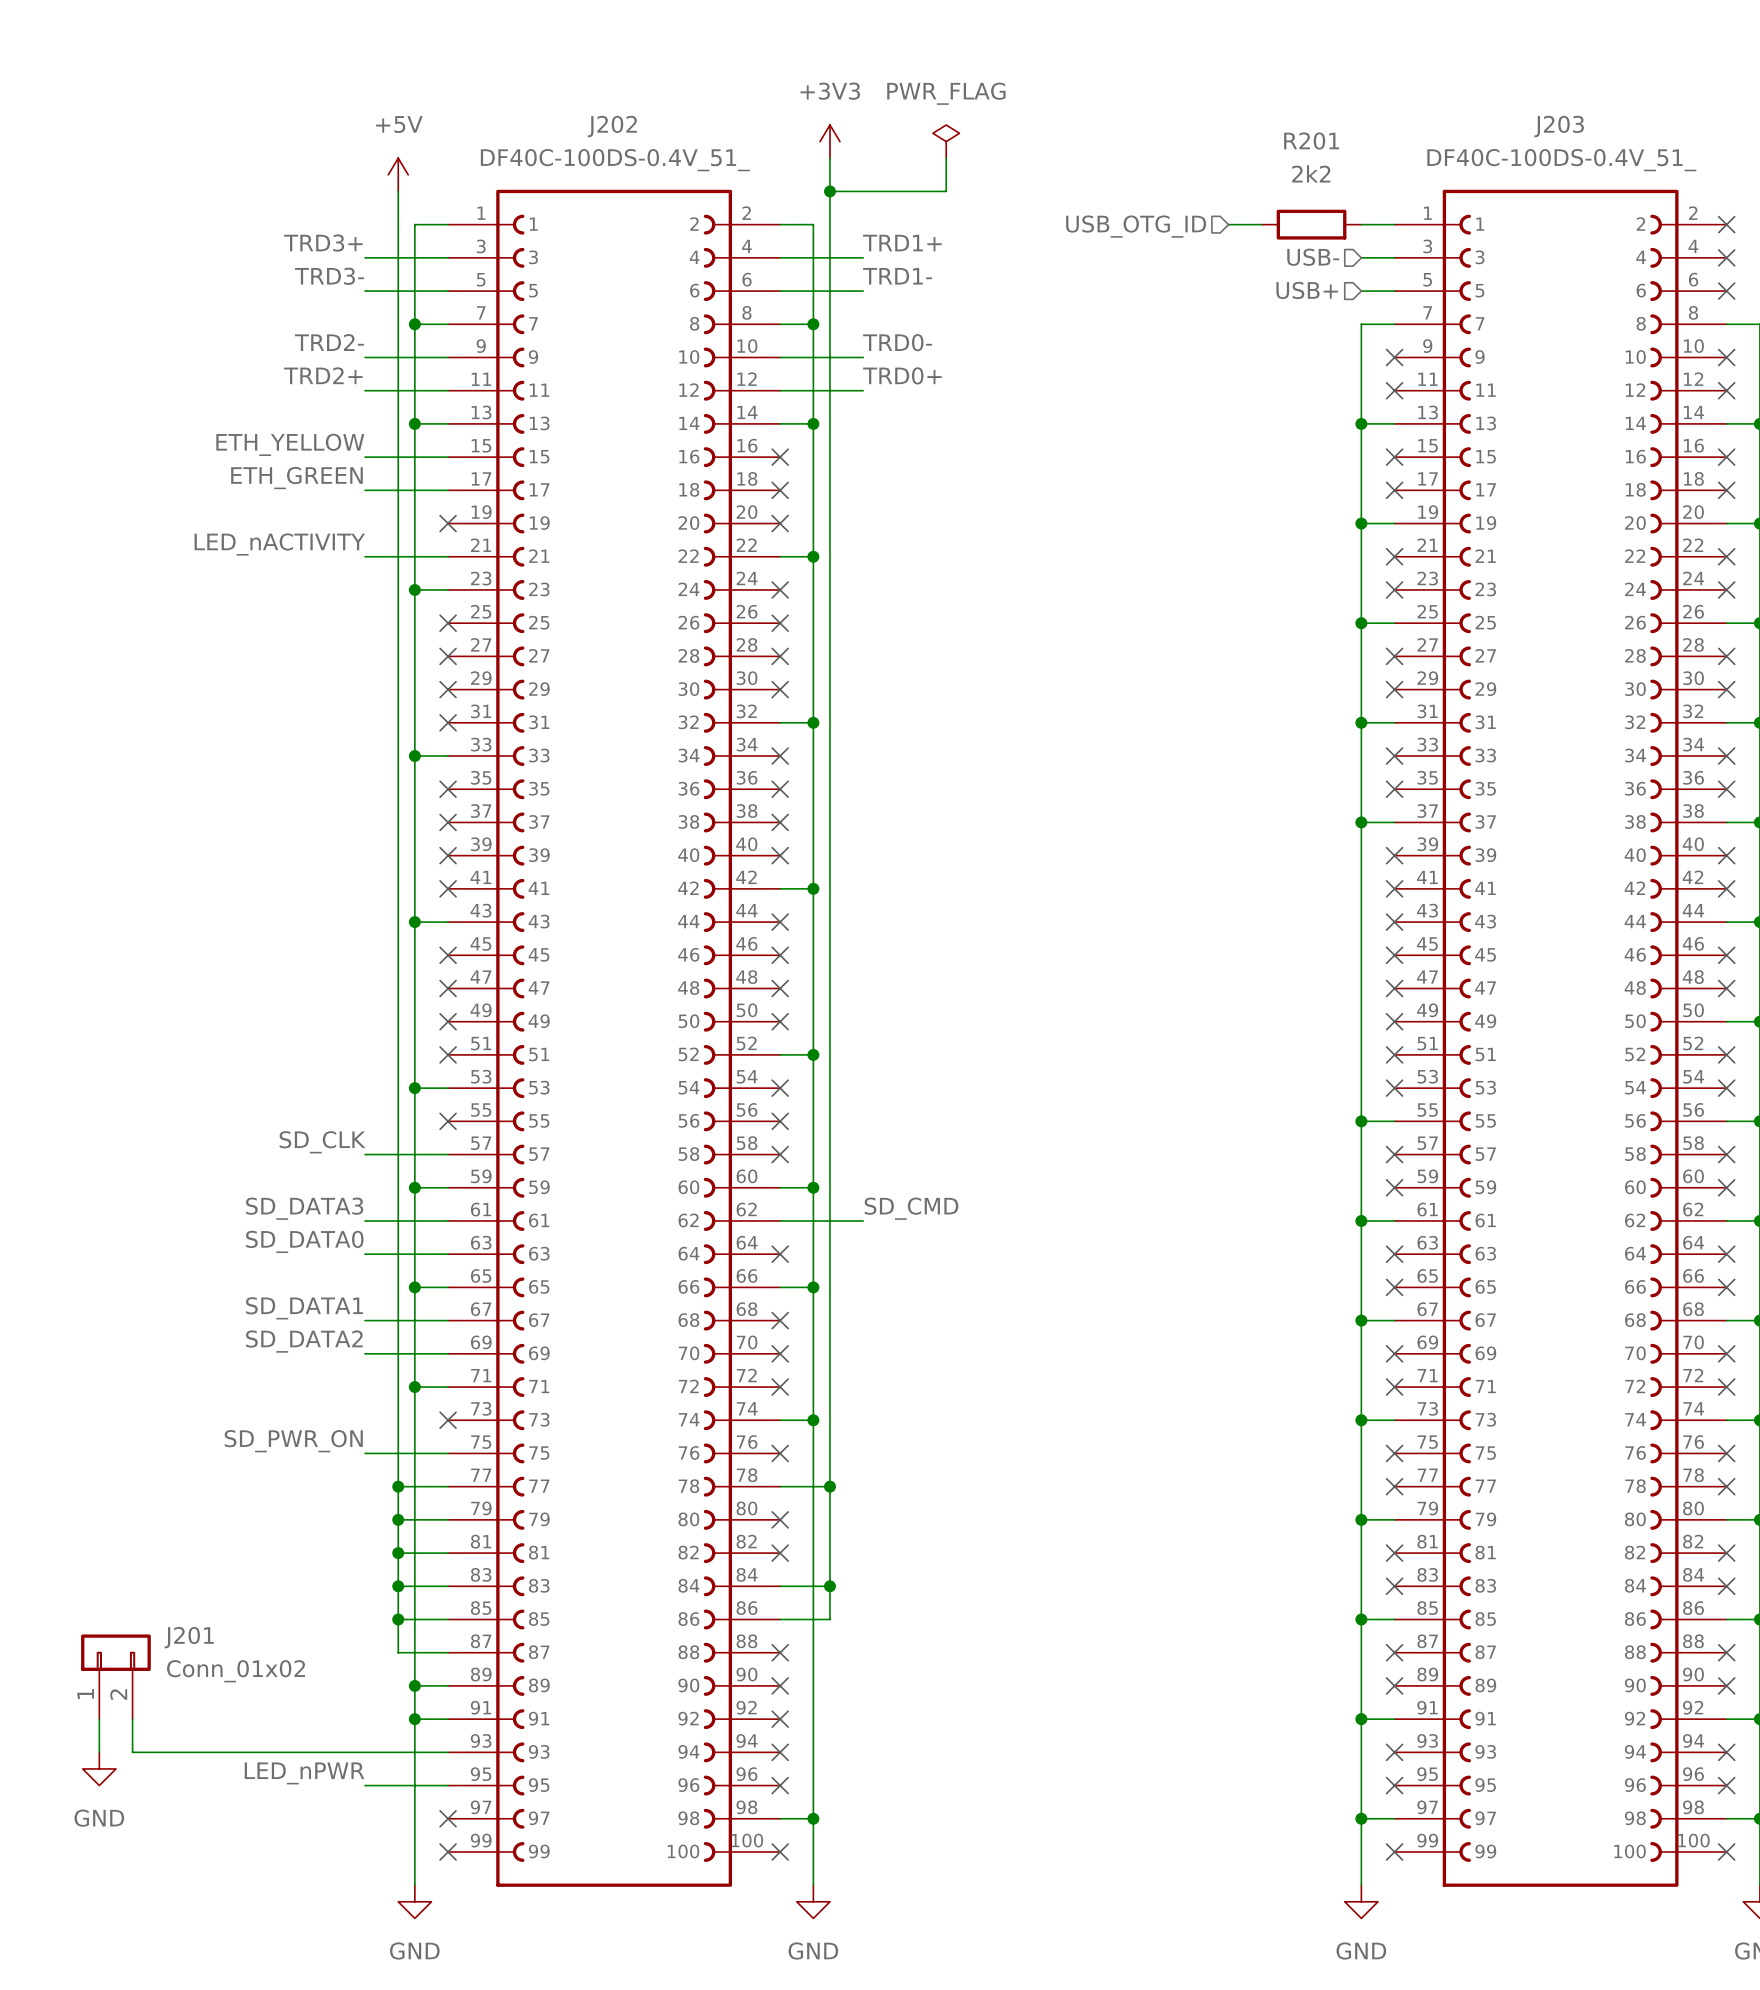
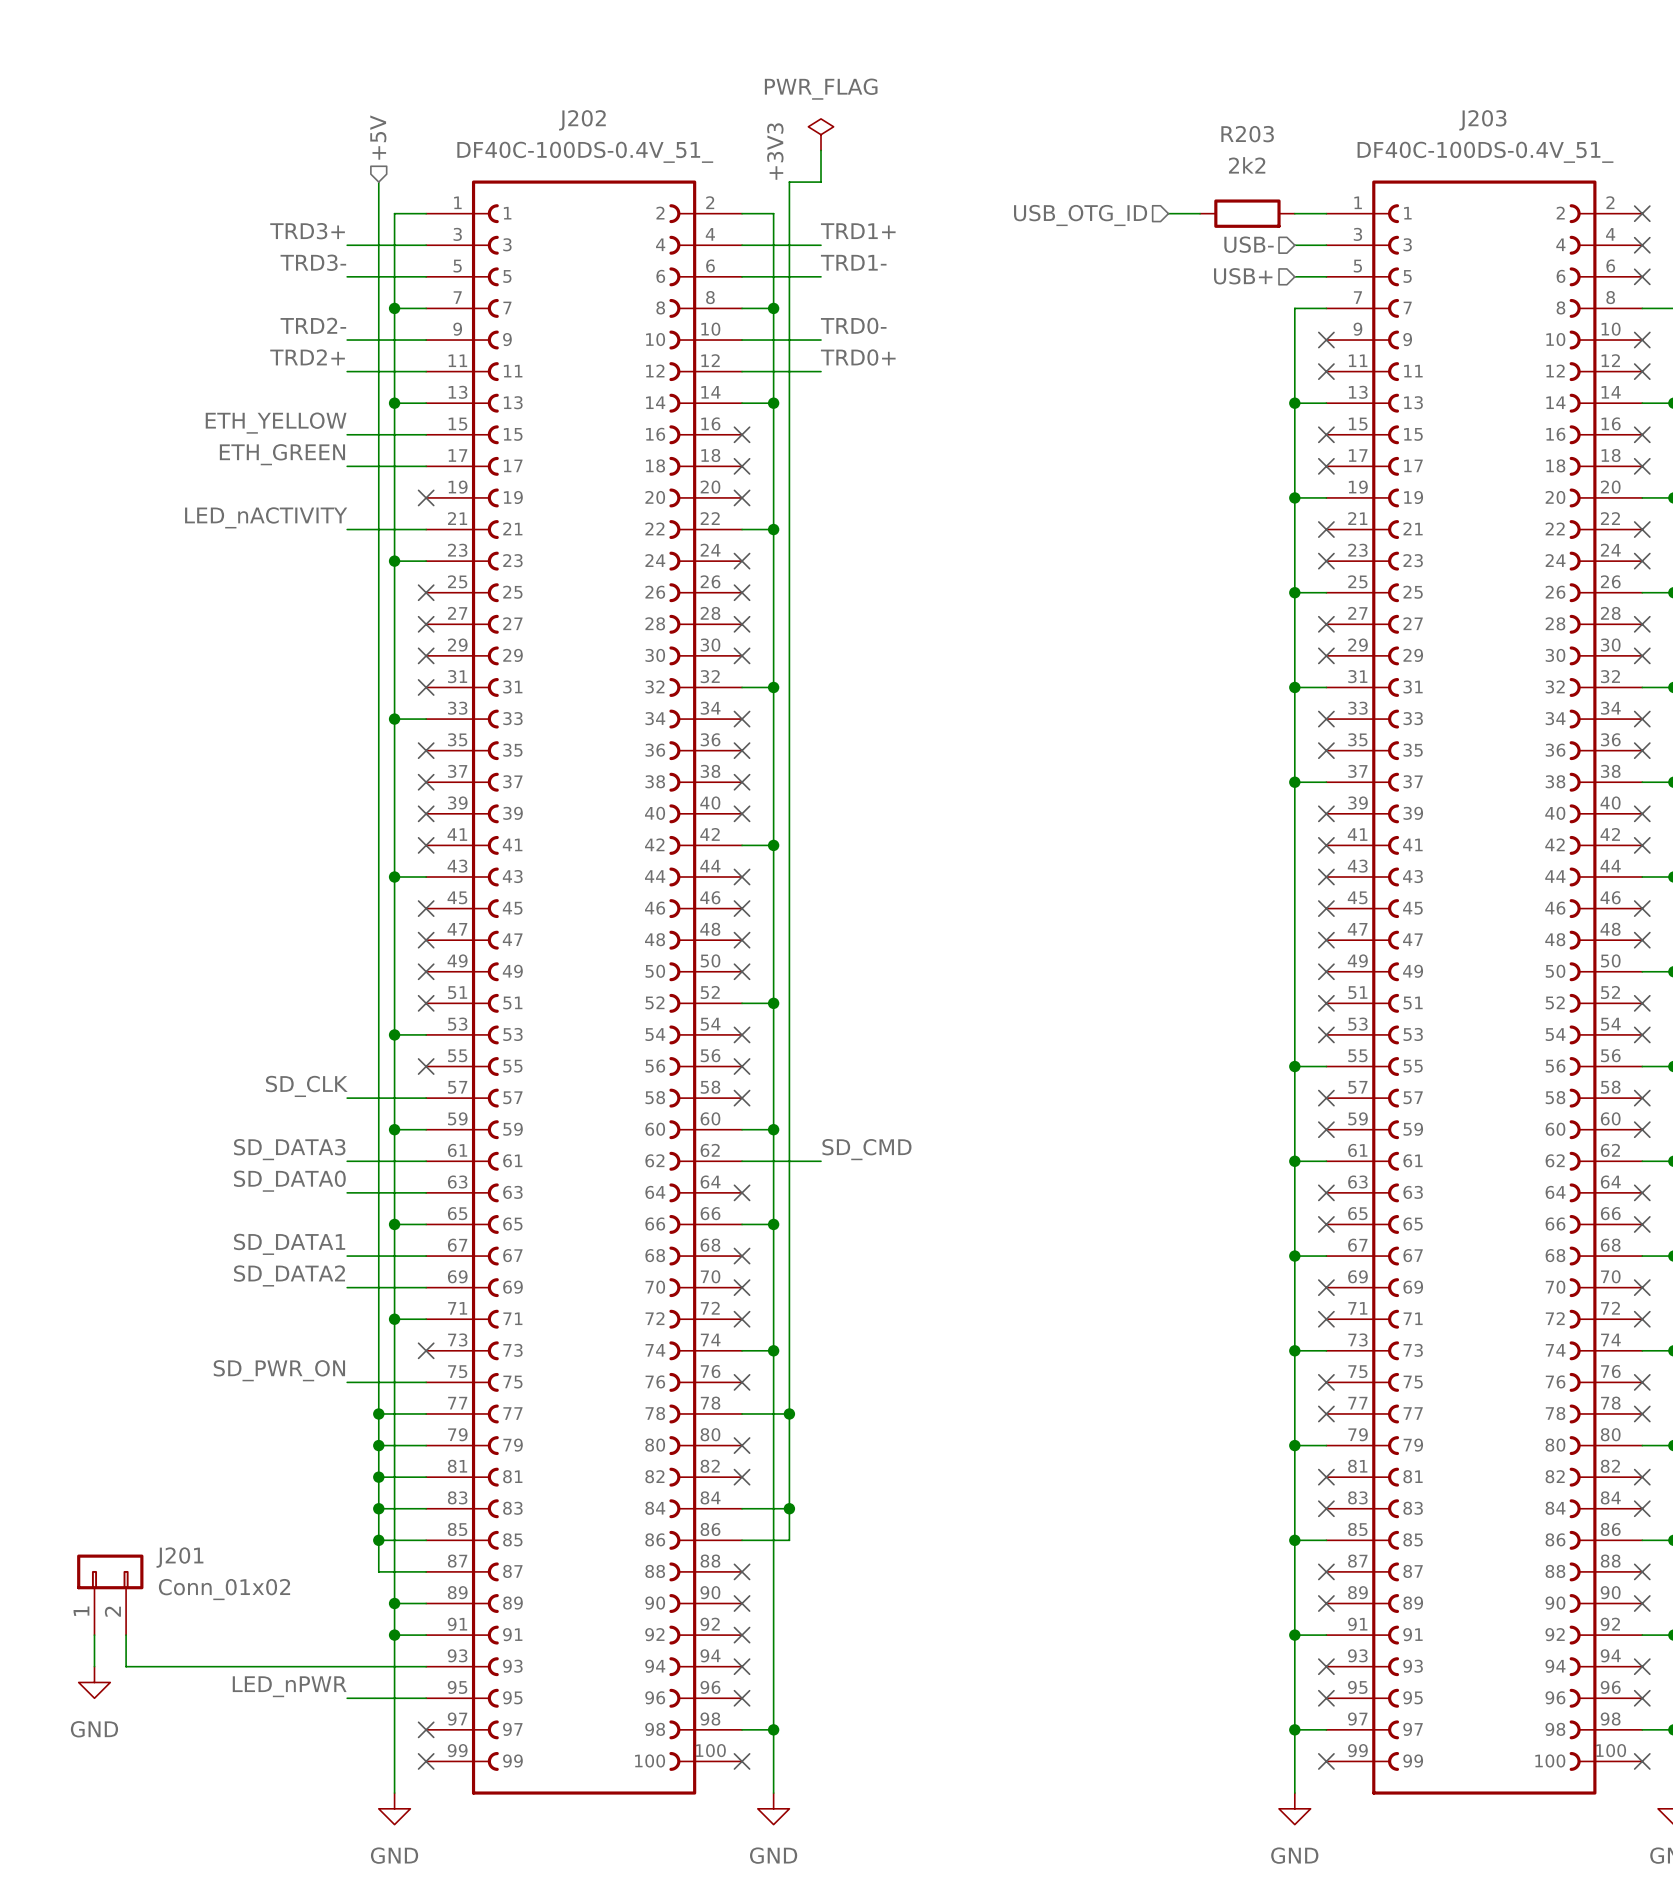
power symbol: +3V3 (829, 141) -> none
power symbol position: PWR_FLAG (946, 141) -> PWR_FLAG (821, 134)
R201 name: R201 (1311, 141) -> R203 (1247, 134)
hierarchical label: none -> +5V (378, 137)
wire: (829, 158) (829, 191) -> none
wire: (946, 158) (946, 191) (863, 191) -> (821, 150) (821, 182)
label: none -> +3V3 (775, 151)
power symbol: +5V (398, 174) -> none
junction: (829, 191) -> none

